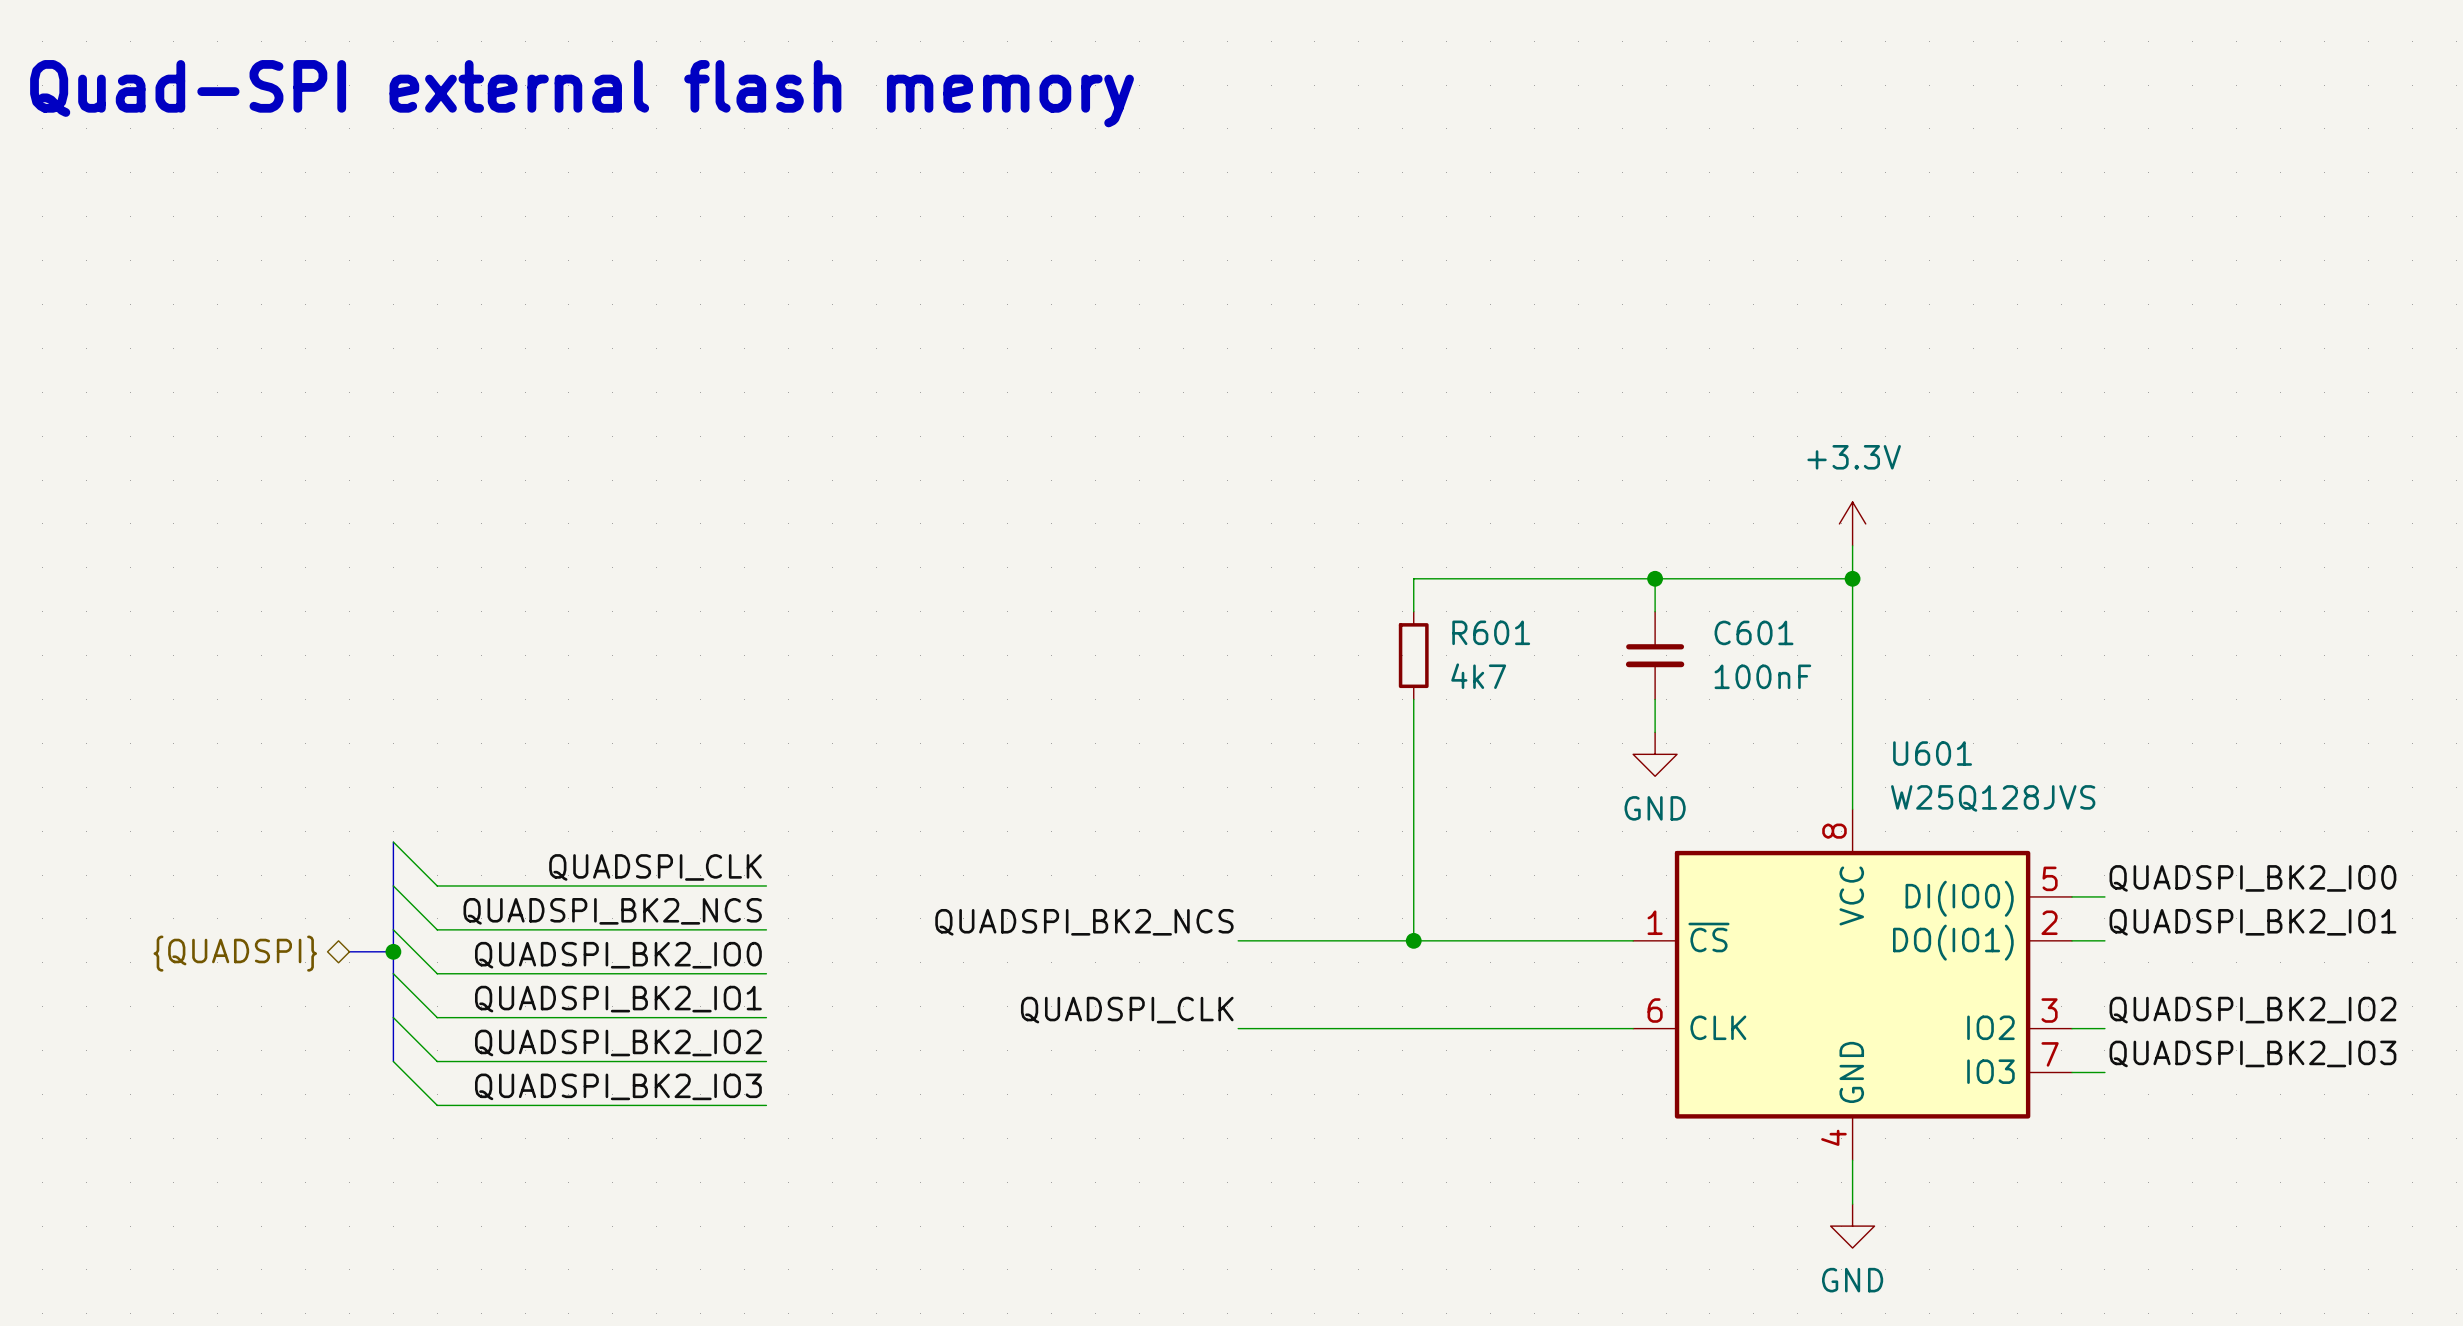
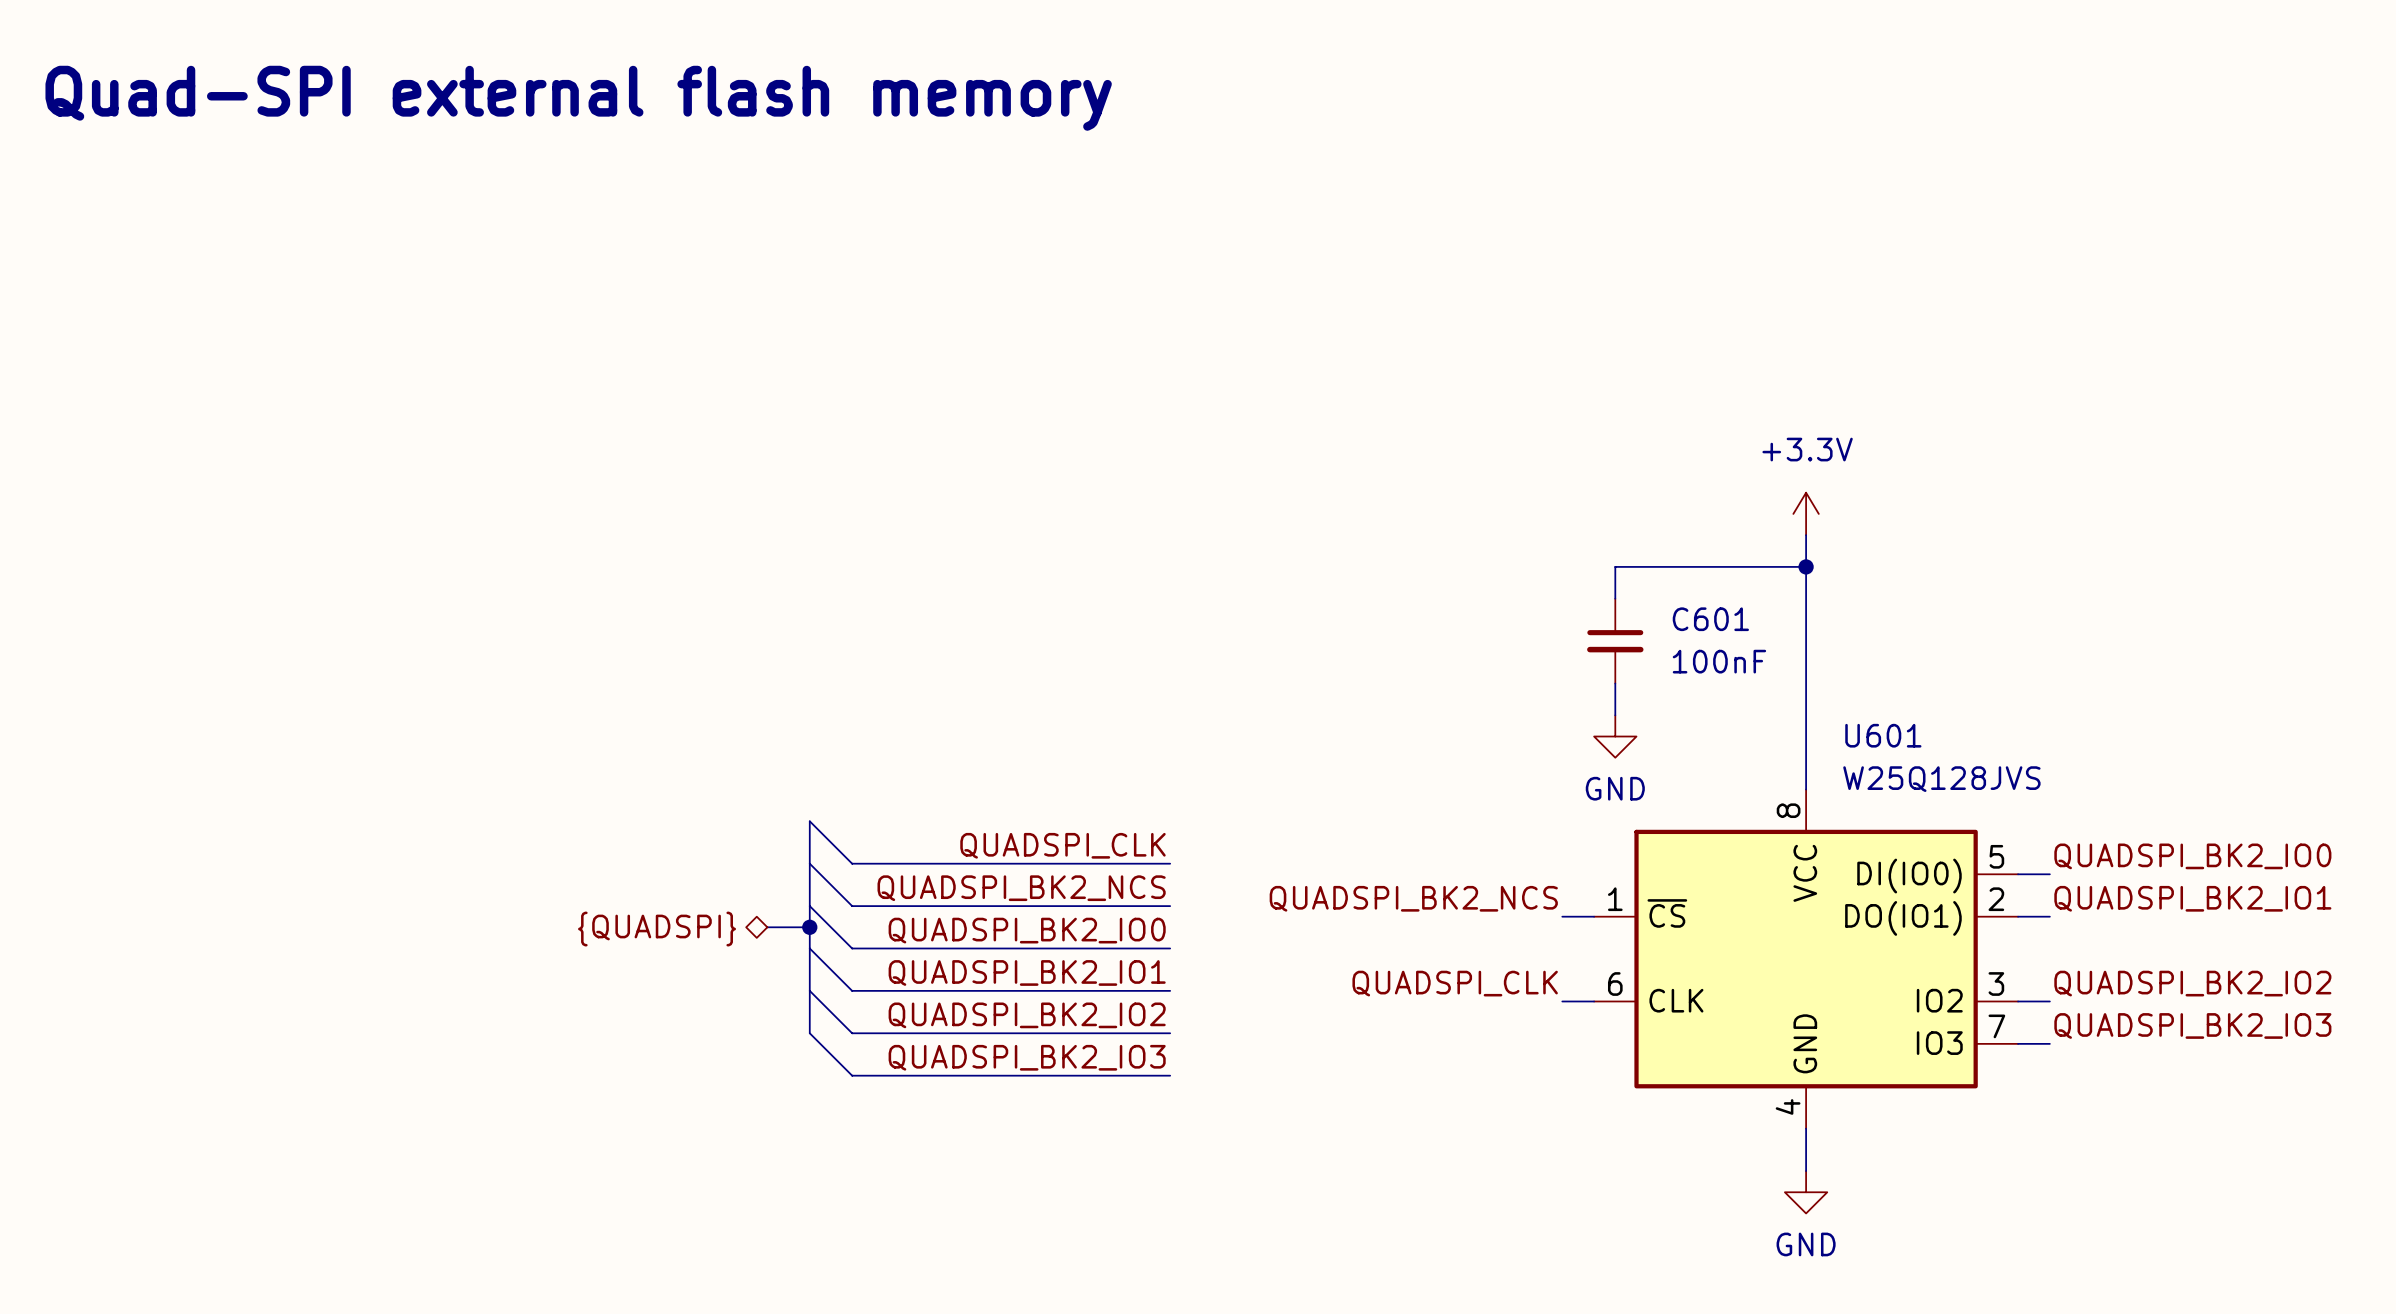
wire: (1655, 578) (1413, 578) (1413, 611) -> none
junction: (1655, 578) -> none
R601: 4k7 (1413, 655) -> none
wire: (1413, 699) (1413, 940) -> none
wire: (393, 842) (437, 885) (766, 885) -> (809, 821) (852, 863) (1170, 863)
bus: (393, 842) (393, 1061) -> (809, 821) (809, 1033)
label: QUADSPI_CLK (655, 867) -> none
wire: (393, 885) (437, 929) (766, 929) -> (809, 863) (852, 906) (1170, 906)
label: QUADSPI_BK2_NCS (612, 911) -> none
label position: QUADSPI_BK2_NCS (1084, 922) -> QUADSPI_BK2_NCS (1021, 888)
label: none -> QUADSPI_BK2_NCS (1413, 898)
wire: (393, 929) (437, 973) (766, 973) -> (809, 906) (852, 948) (1170, 948)
wire: (1238, 940) (1600, 940) -> none
junction: (1413, 940) -> none
bus: (349, 951) (393, 951) -> (767, 927) (809, 927)
junction: (393, 951) -> none
junction: none -> (809, 927)
hierarchical label position: {QUADSPI} (235, 953) -> {QUADSPI} (657, 929)
label position: QUADSPI_BK2_IO0 (618, 955) -> QUADSPI_BK2_IO0 (1027, 930)
wire: (393, 973) (437, 1017) (766, 1017) -> (809, 948) (852, 990) (1170, 990)
label position: QUADSPI_BK2_IO1 (618, 999) -> QUADSPI_BK2_IO1 (1027, 972)
label position: QUADSPI_CLK (1127, 1010) -> QUADSPI_CLK (1062, 845)
label: none -> QUADSPI_CLK (1455, 983)
wire: (393, 1017) (437, 1061) (766, 1061) -> (809, 990) (852, 1033) (1170, 1033)
wire: (1238, 1028) (1600, 1028) -> none
label position: QUADSPI_BK2_IO2 (618, 1042) -> QUADSPI_BK2_IO2 (1027, 1015)
wire: (393, 1061) (437, 1105) (766, 1105) -> (809, 1033) (852, 1075) (1170, 1075)
label position: QUADSPI_BK2_IO3 (618, 1086) -> QUADSPI_BK2_IO3 (1027, 1057)

